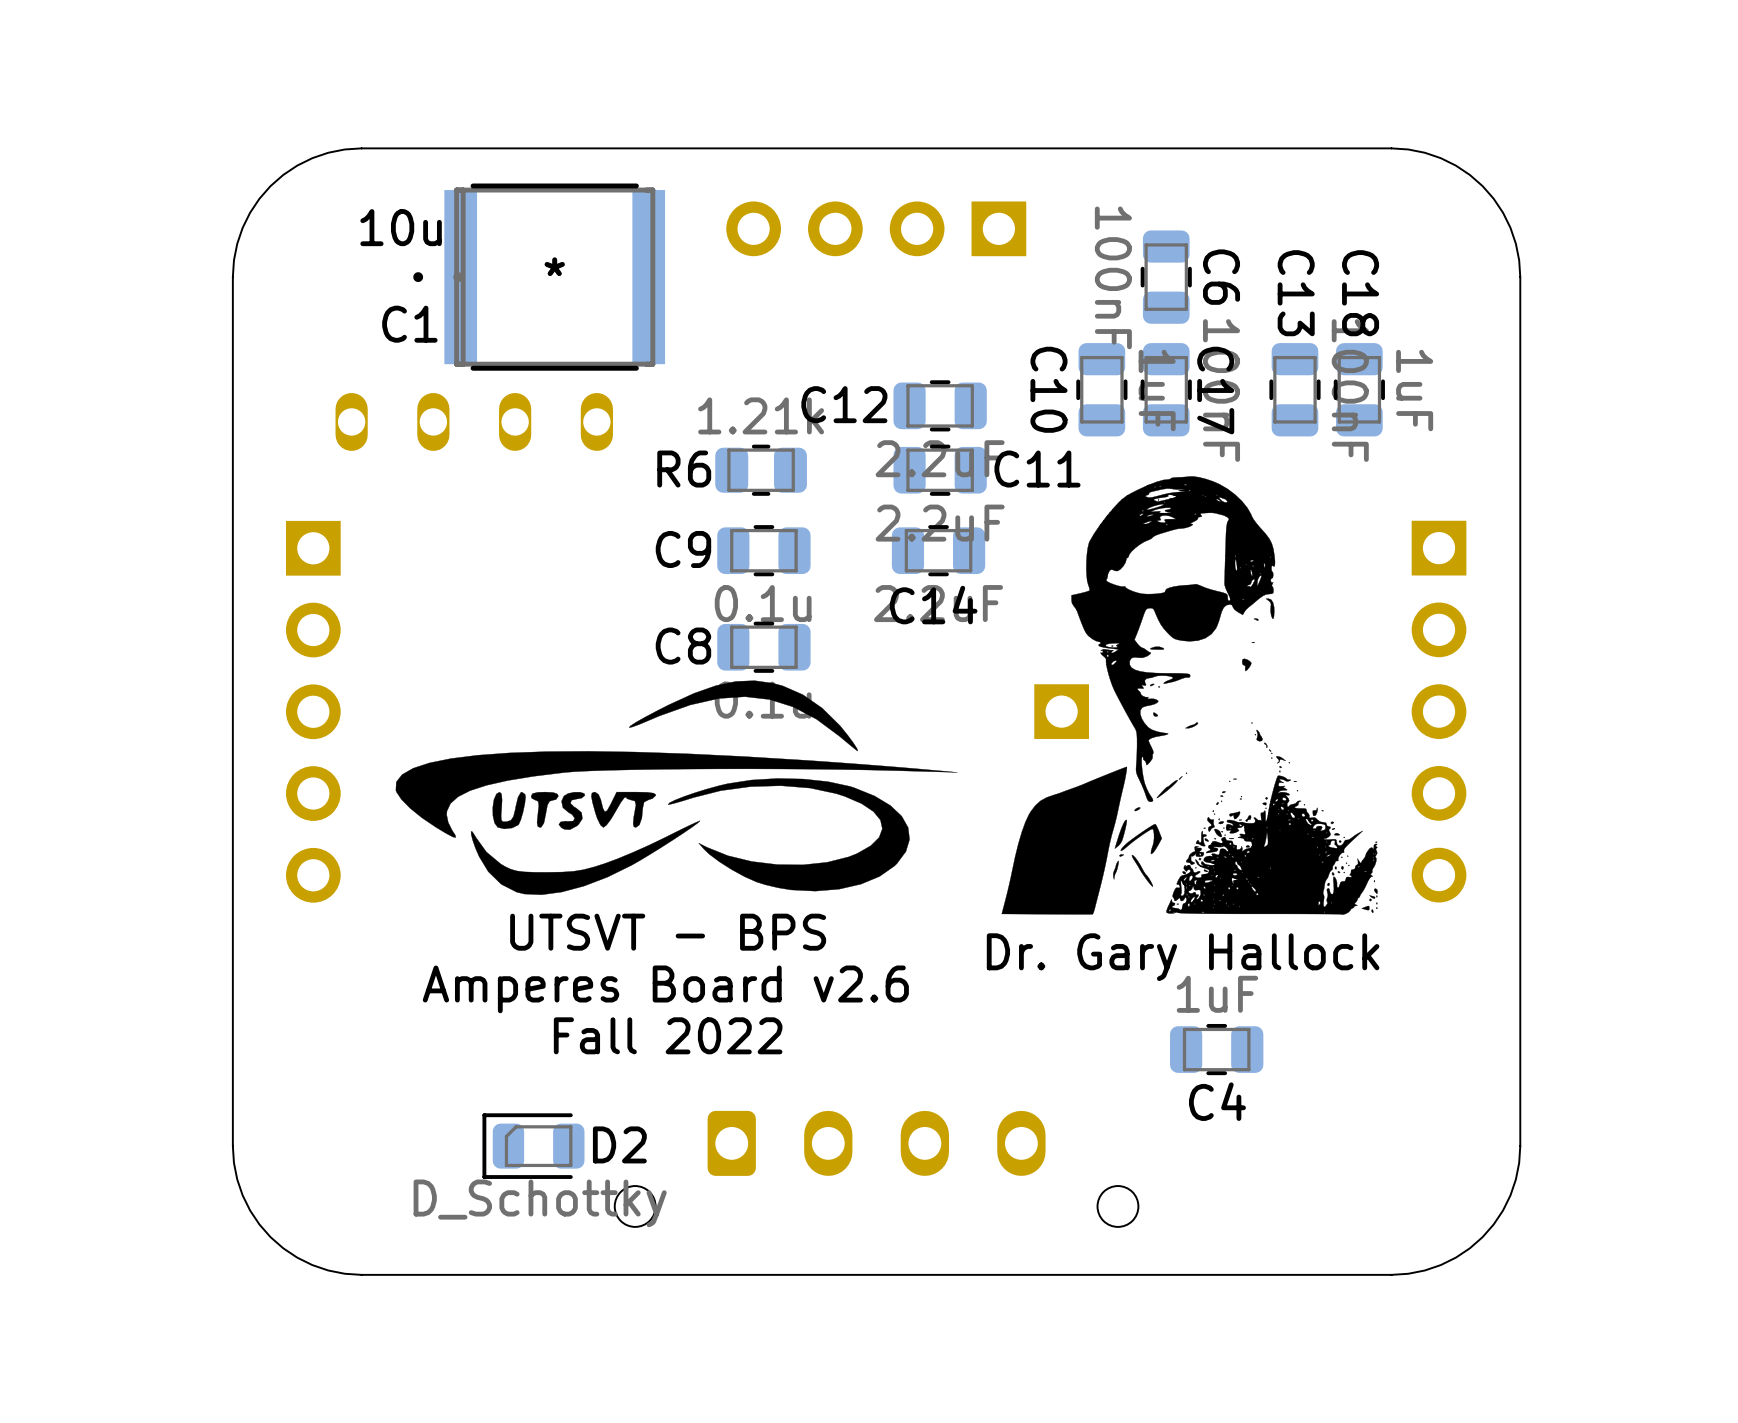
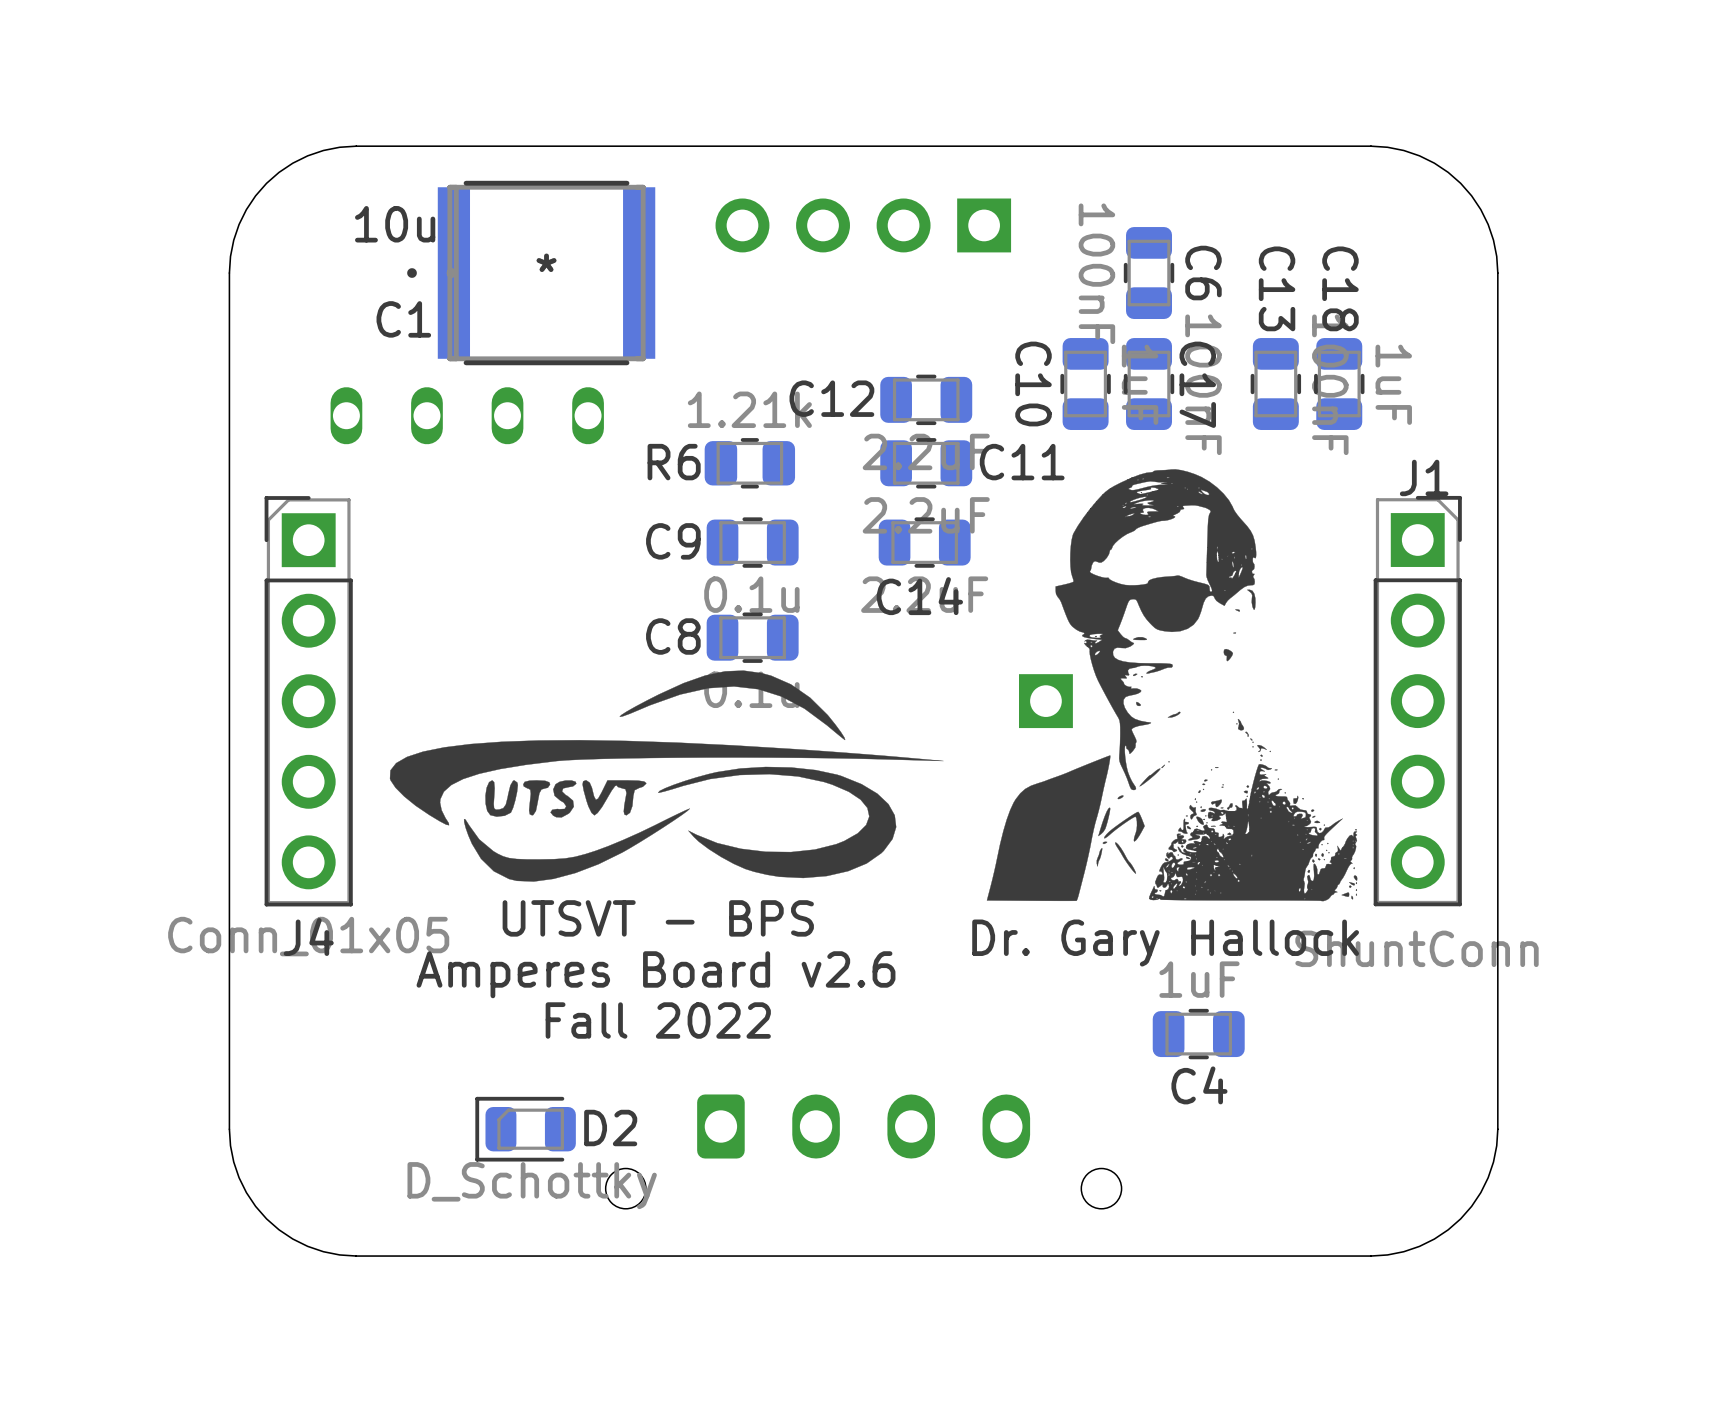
J4 side: top (313, 711) -> bottom (308, 701)
J1 side: top (1439, 711) -> bottom (1417, 701)

